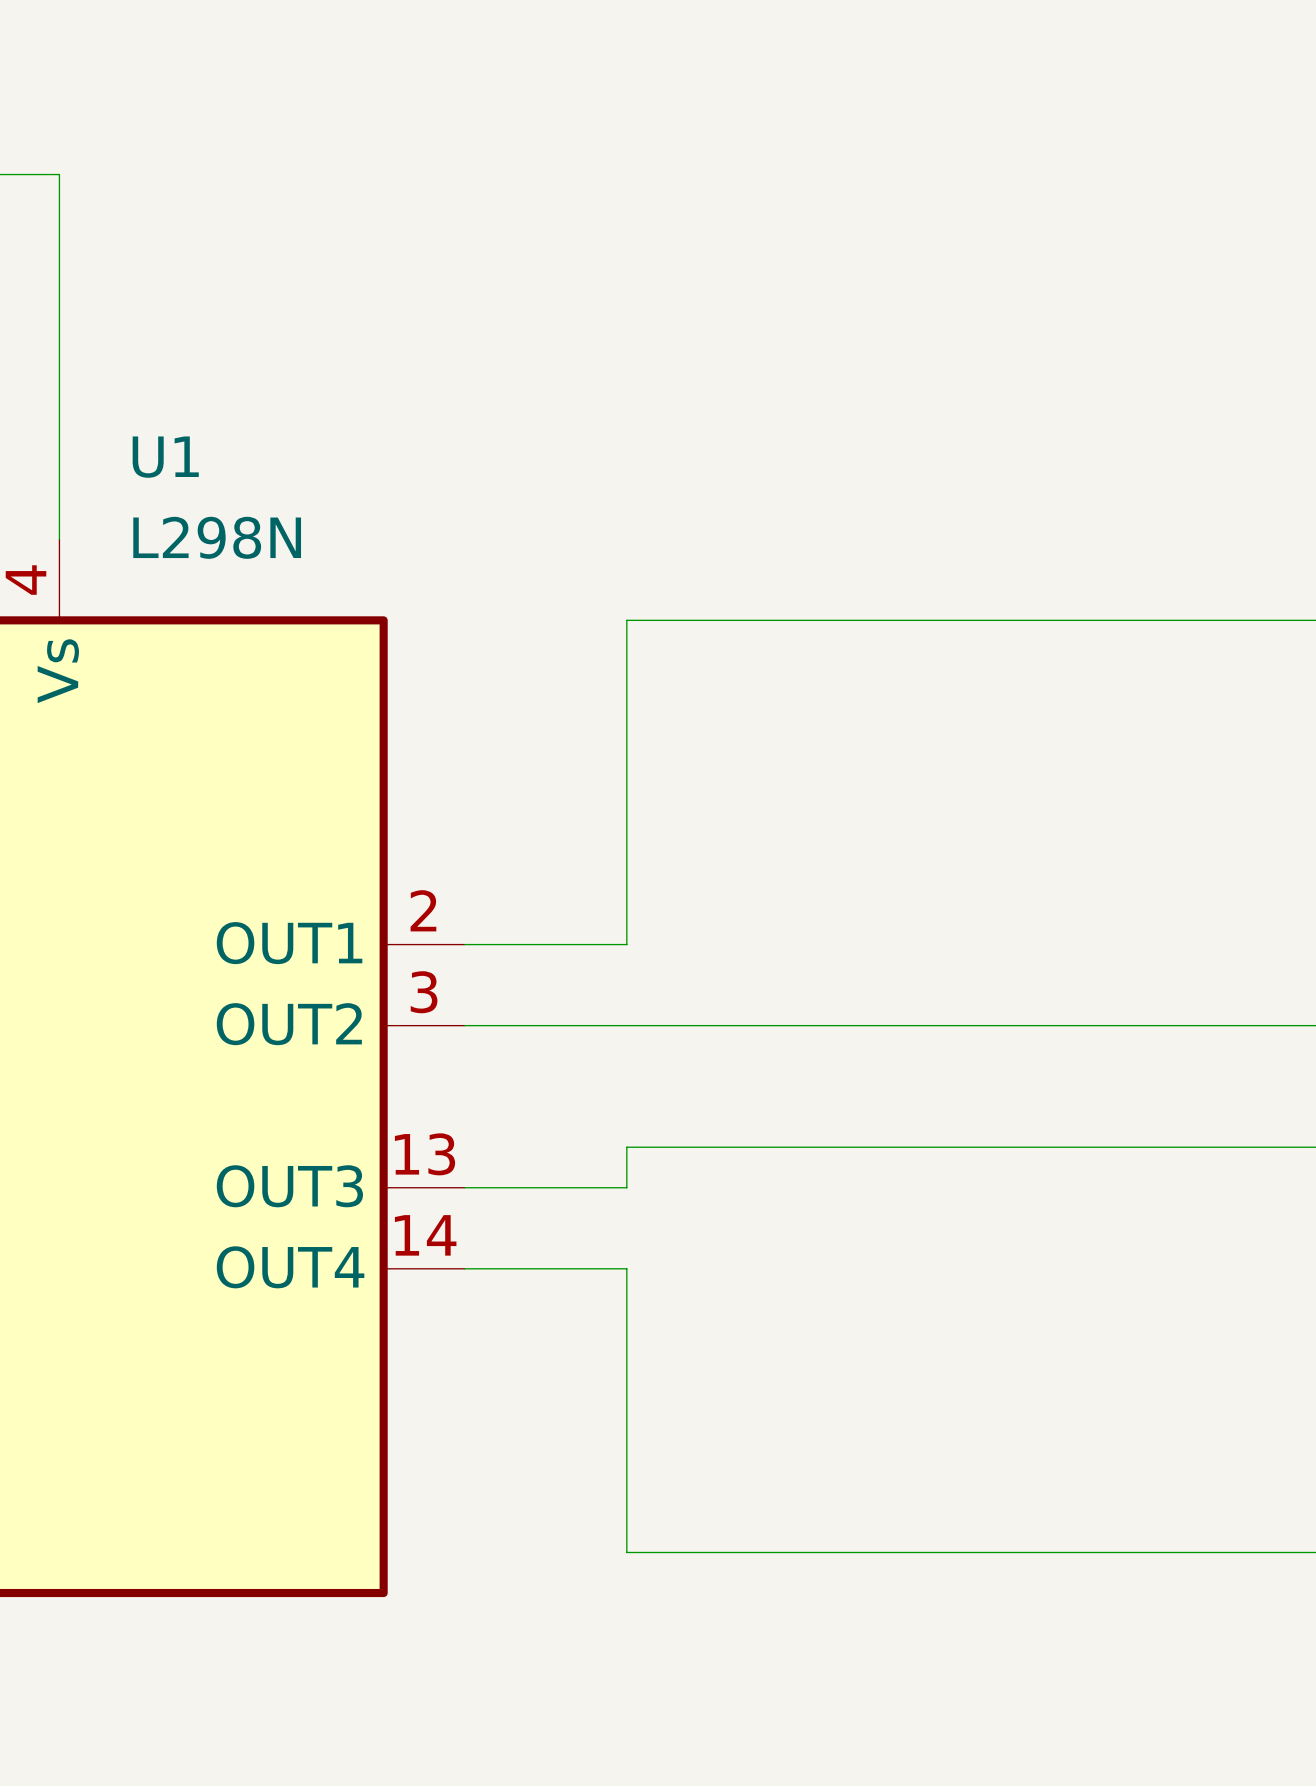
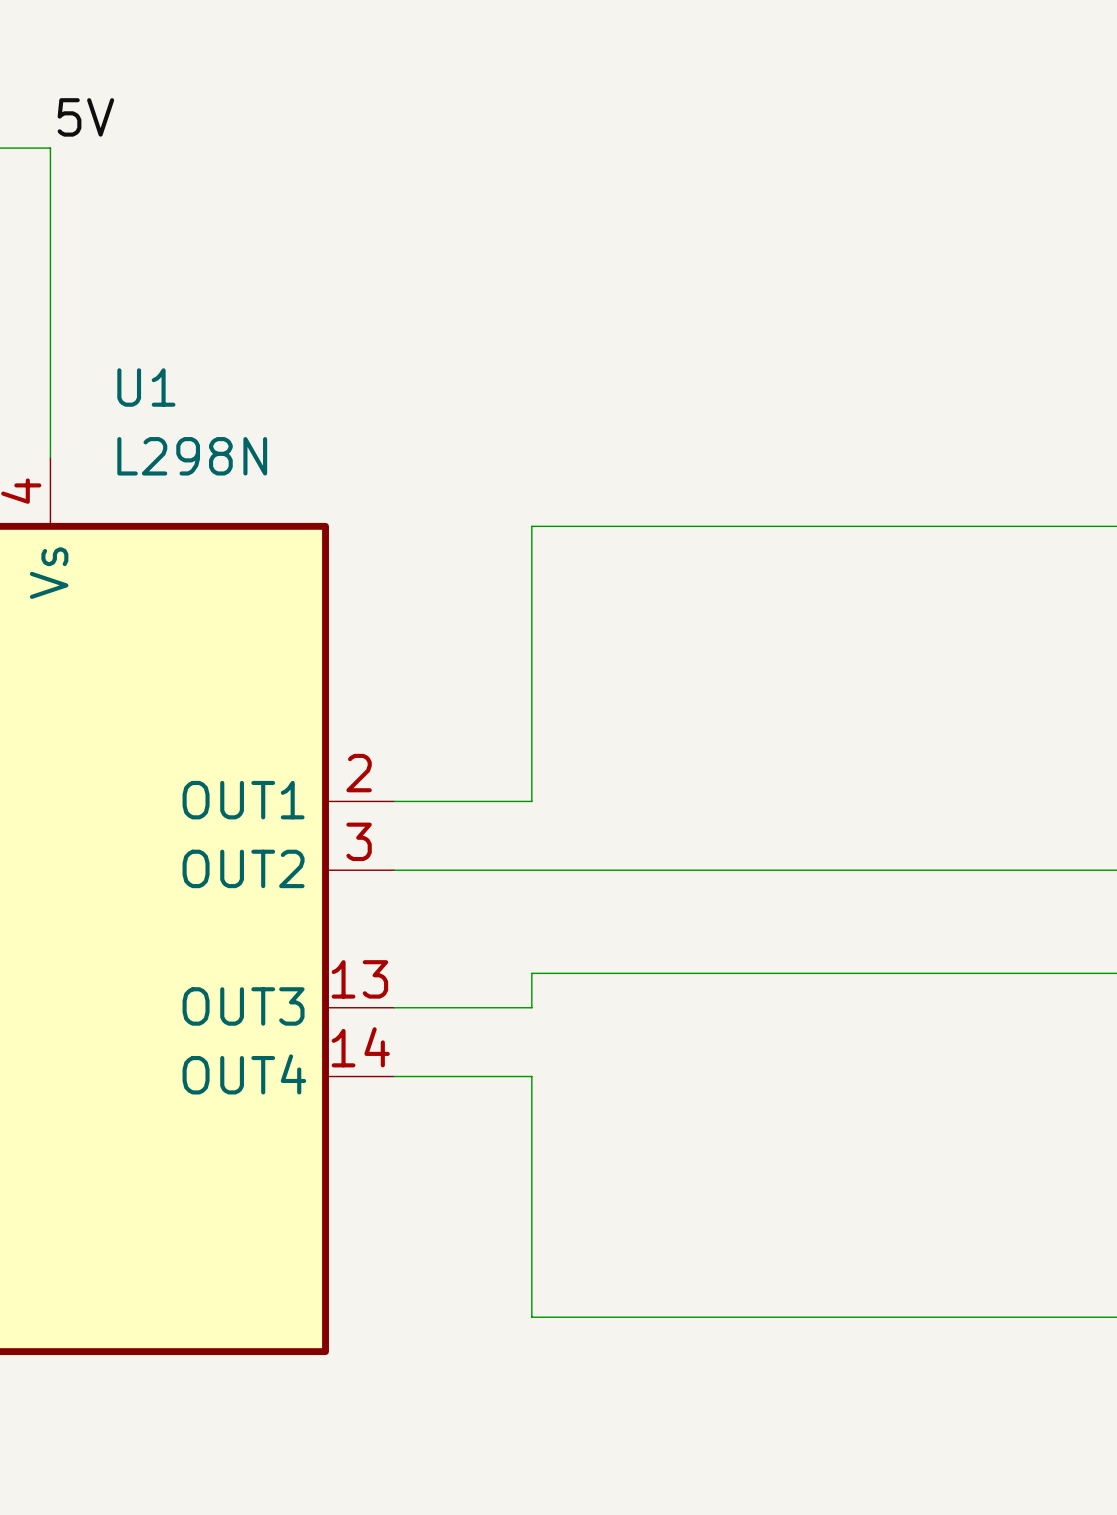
label: none -> 5V (85, 117)

